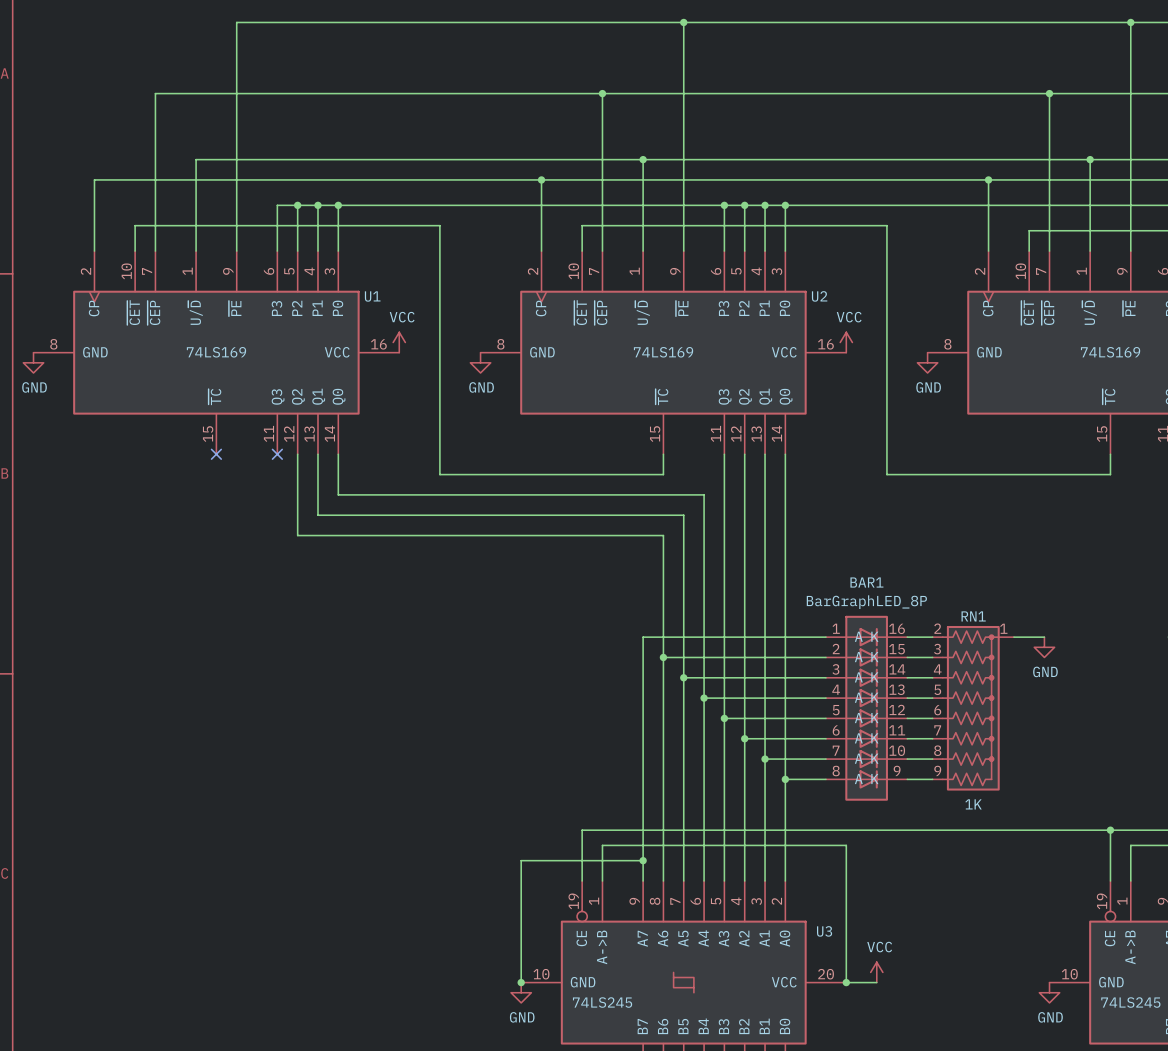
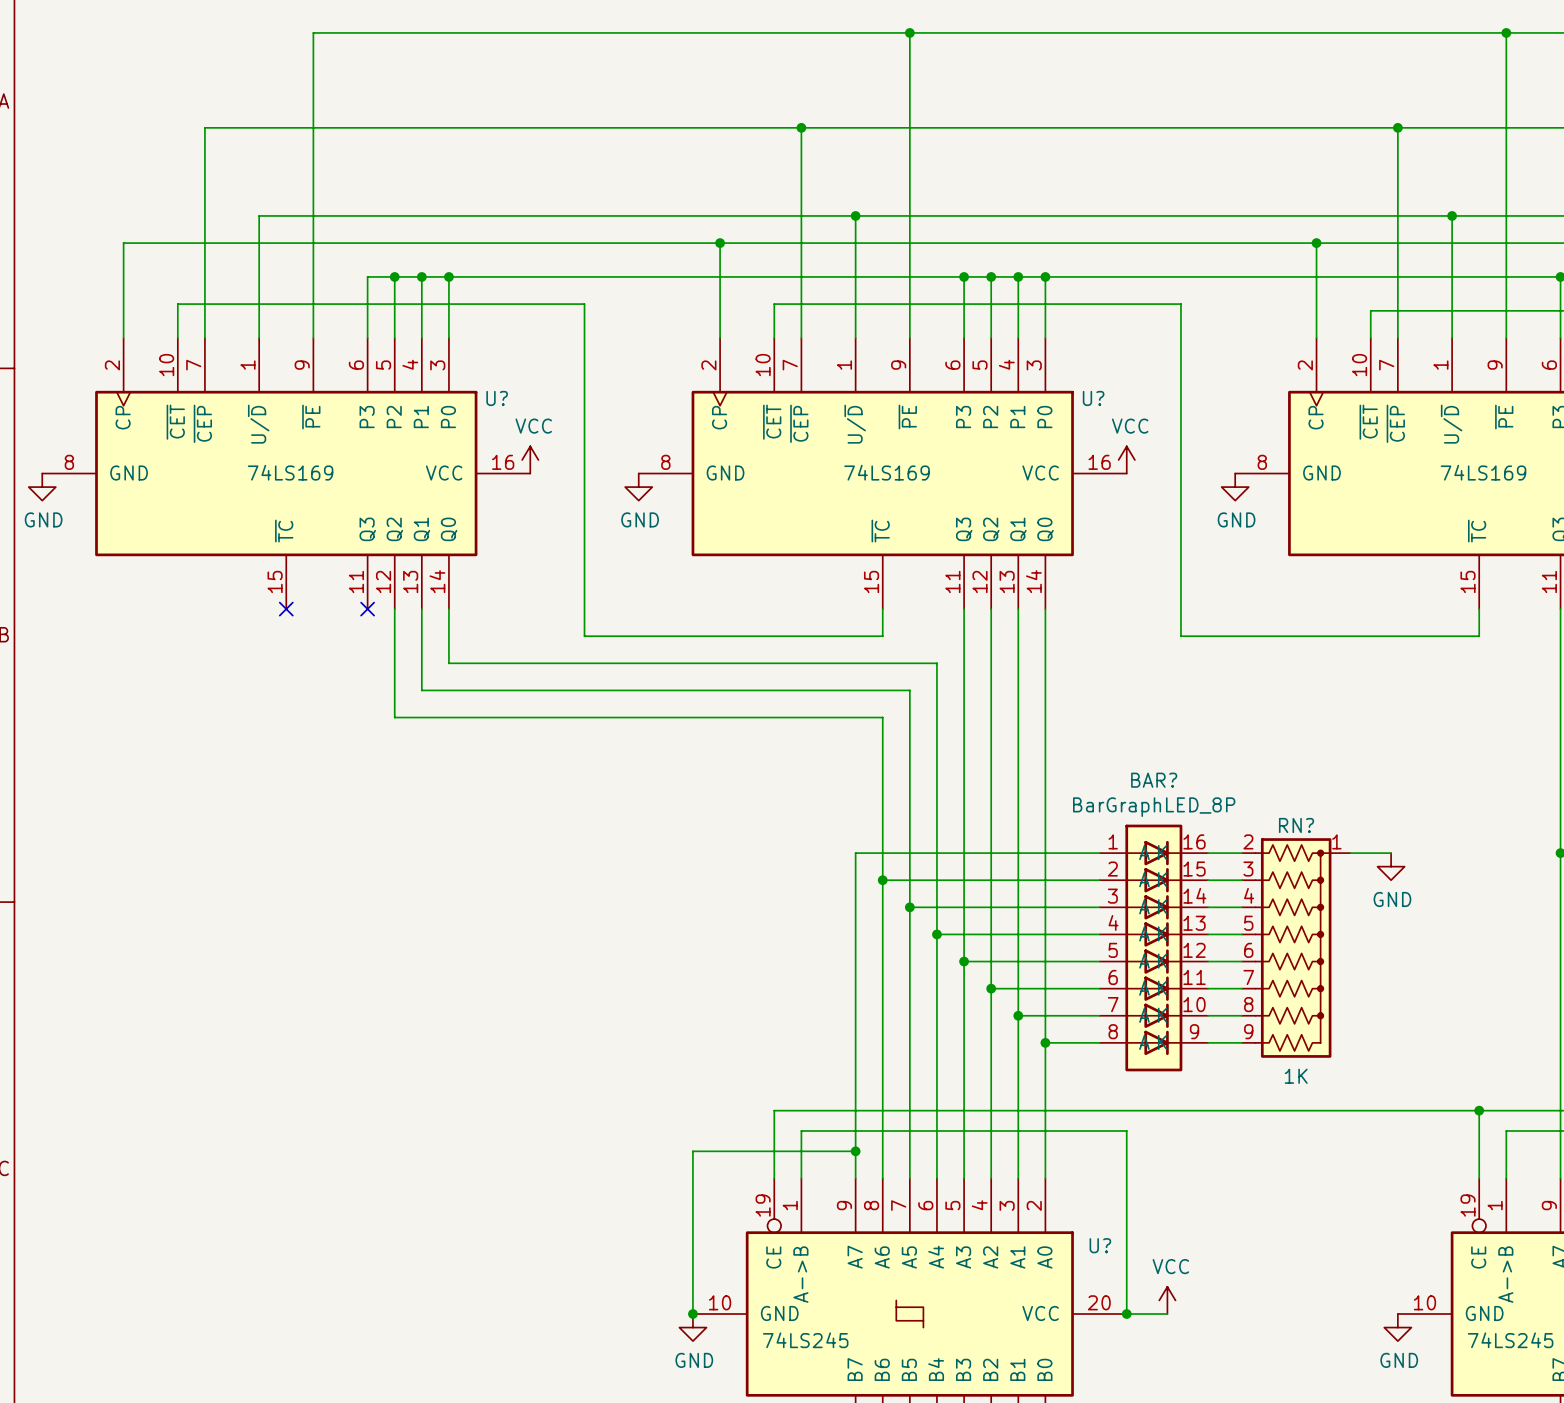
U1 name: U1 (372, 296) -> U? (497, 398)
U2 name: U2 (819, 296) -> U? (1093, 398)
BAR1 name: BAR1 (866, 582) -> BAR? (1154, 780)
RN1 name: RN1 (973, 616) -> RN? (1296, 825)
U3 name: U3 (824, 931) -> U? (1100, 1245)

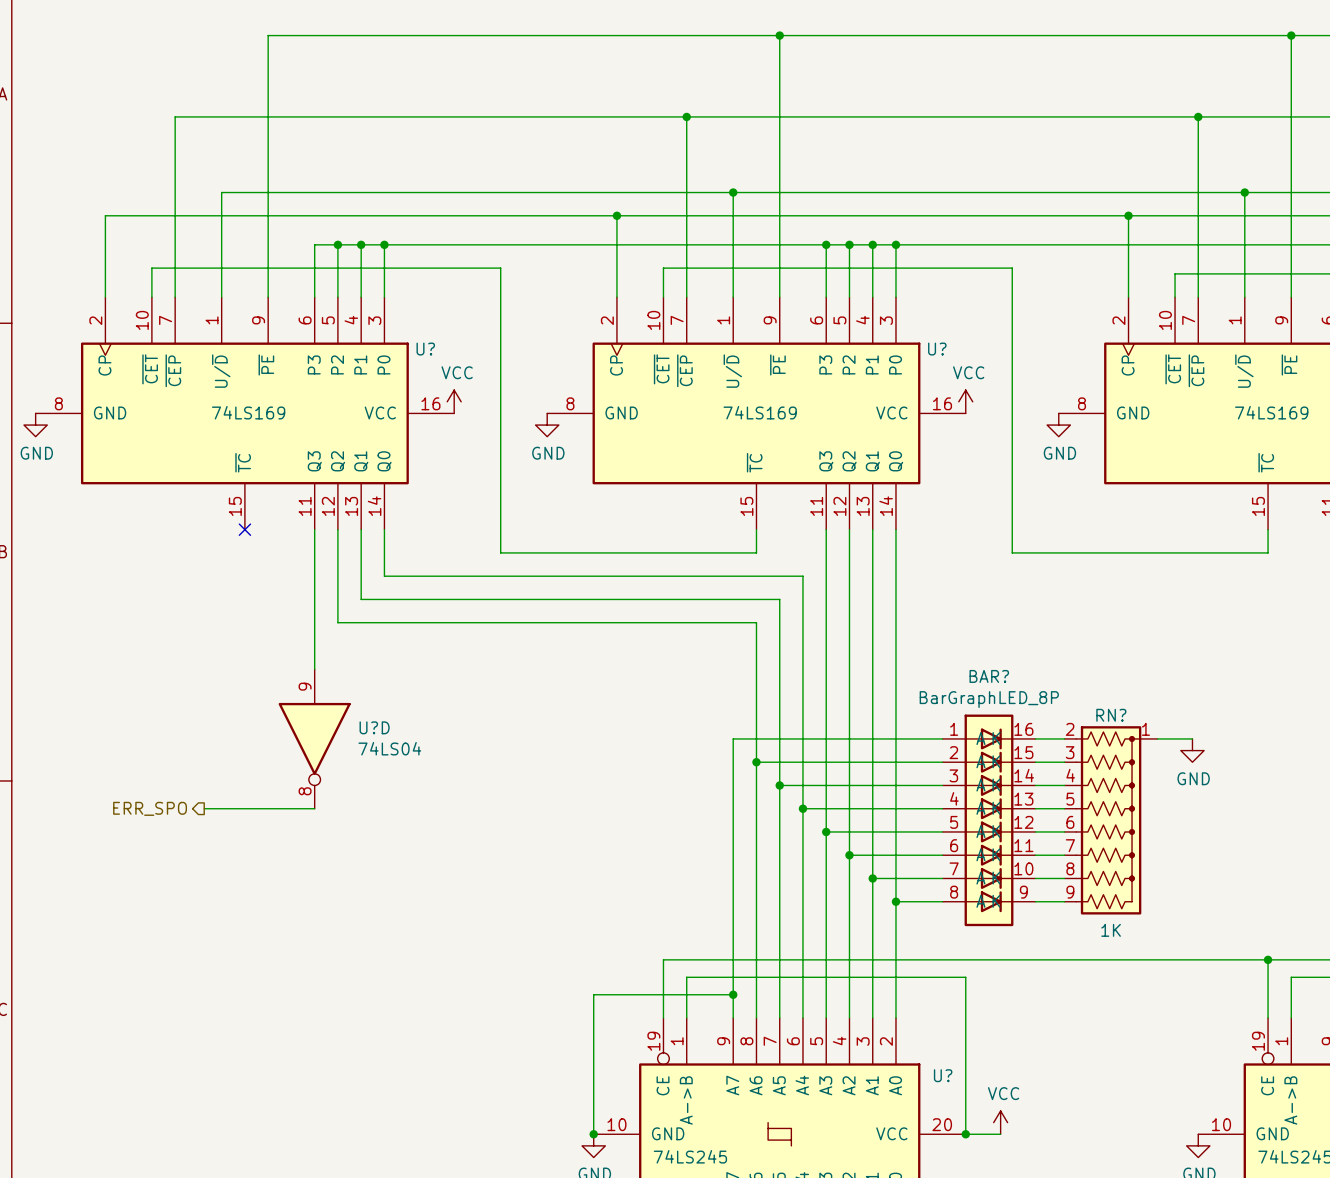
wire: none -> (314, 529) (314, 669)
no-connect mark: (367, 609) -> none
U?D: none -> 74LS04 (314, 738)
hierarchical label: none -> ERR_SPO (150, 808)
wire: none -> (204, 808) (314, 808)

